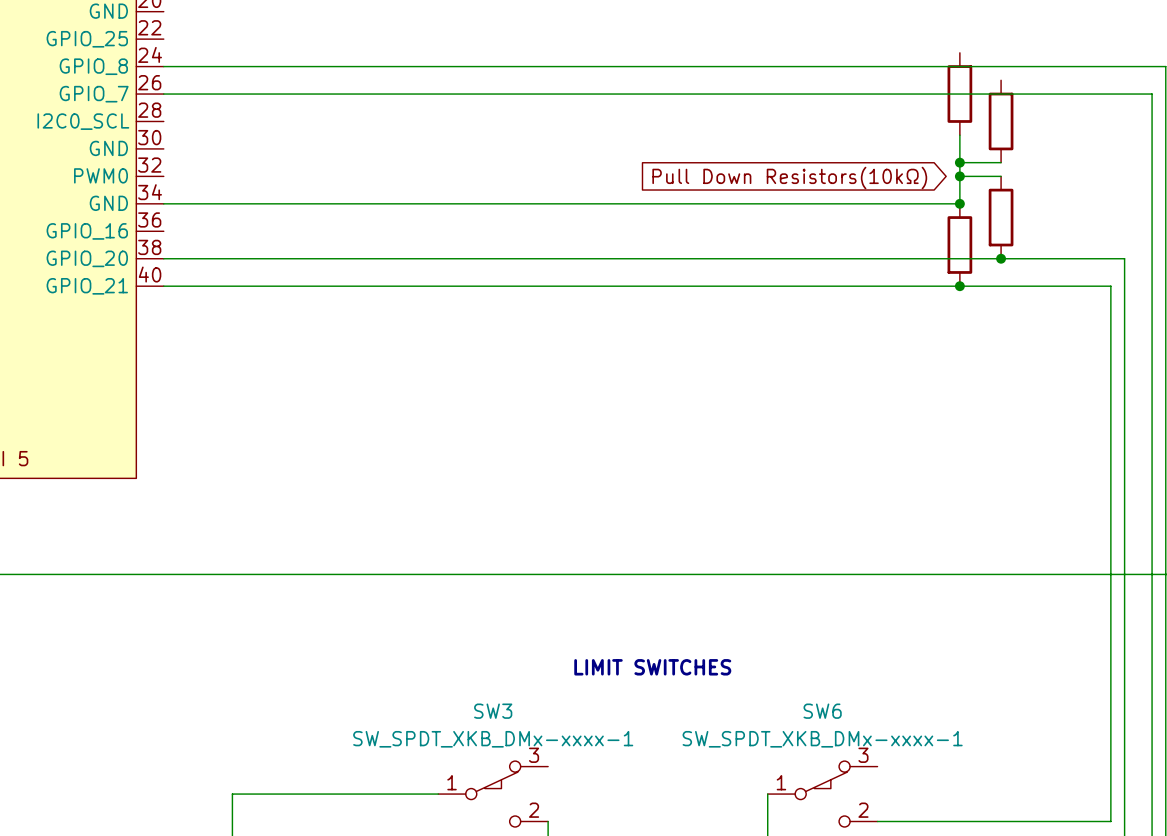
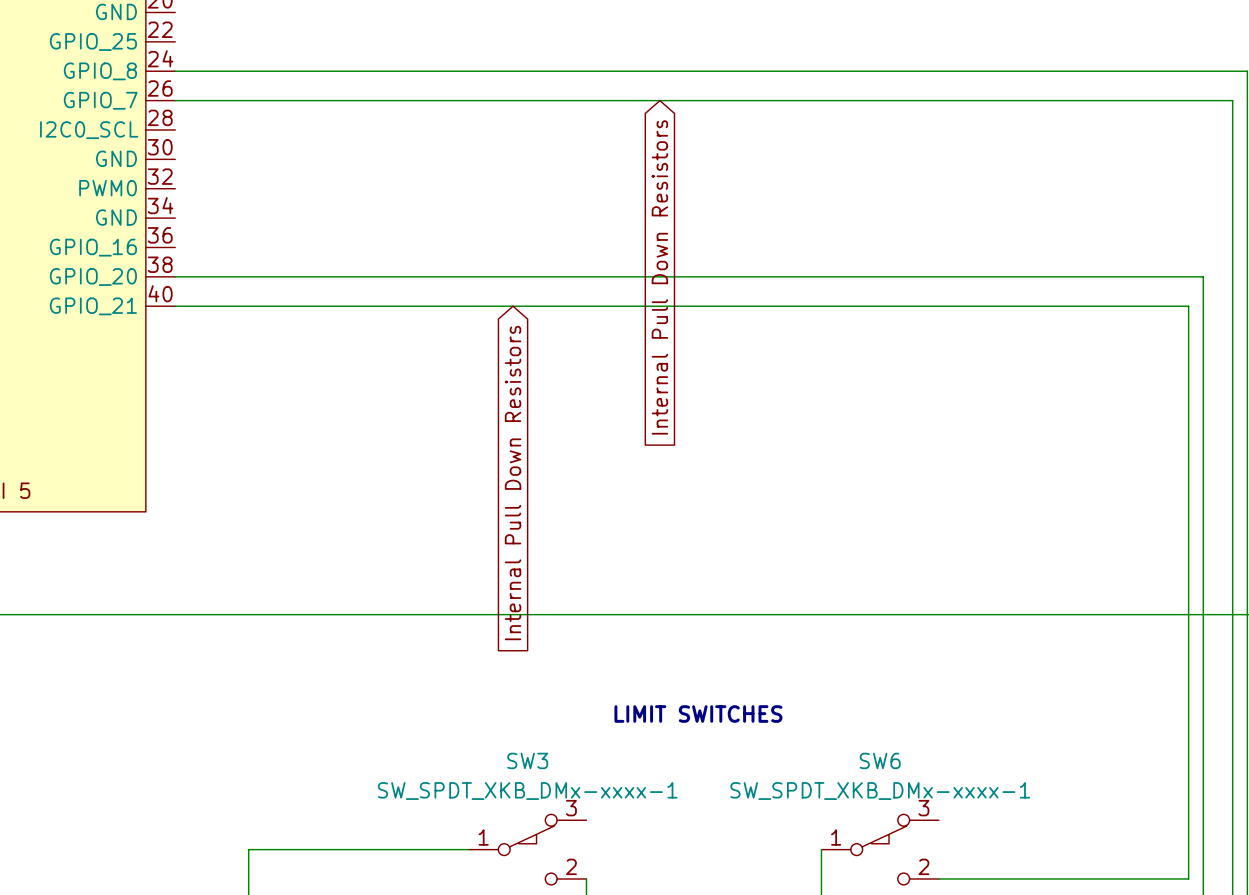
part: (959, 94) -> none
part: (1001, 121) -> none
wire: (959, 135) (959, 203) (163, 203) -> none
wire: (959, 162) (1001, 162) -> none
junction: (959, 162) -> none
wire: (959, 176) (1001, 176) -> none
junction: (959, 176) -> none
global label: Pull Down Resistors(10kΩ) (789, 178) -> none
junction: (959, 203) -> none
part: (1001, 217) -> none
part: (959, 245) -> none
junction: (1001, 258) -> none
global label: none -> Internal Pull Down Resistors (659, 277)
junction: (959, 286) -> none
global label: none -> Internal Pull Down Resistors (513, 483)

